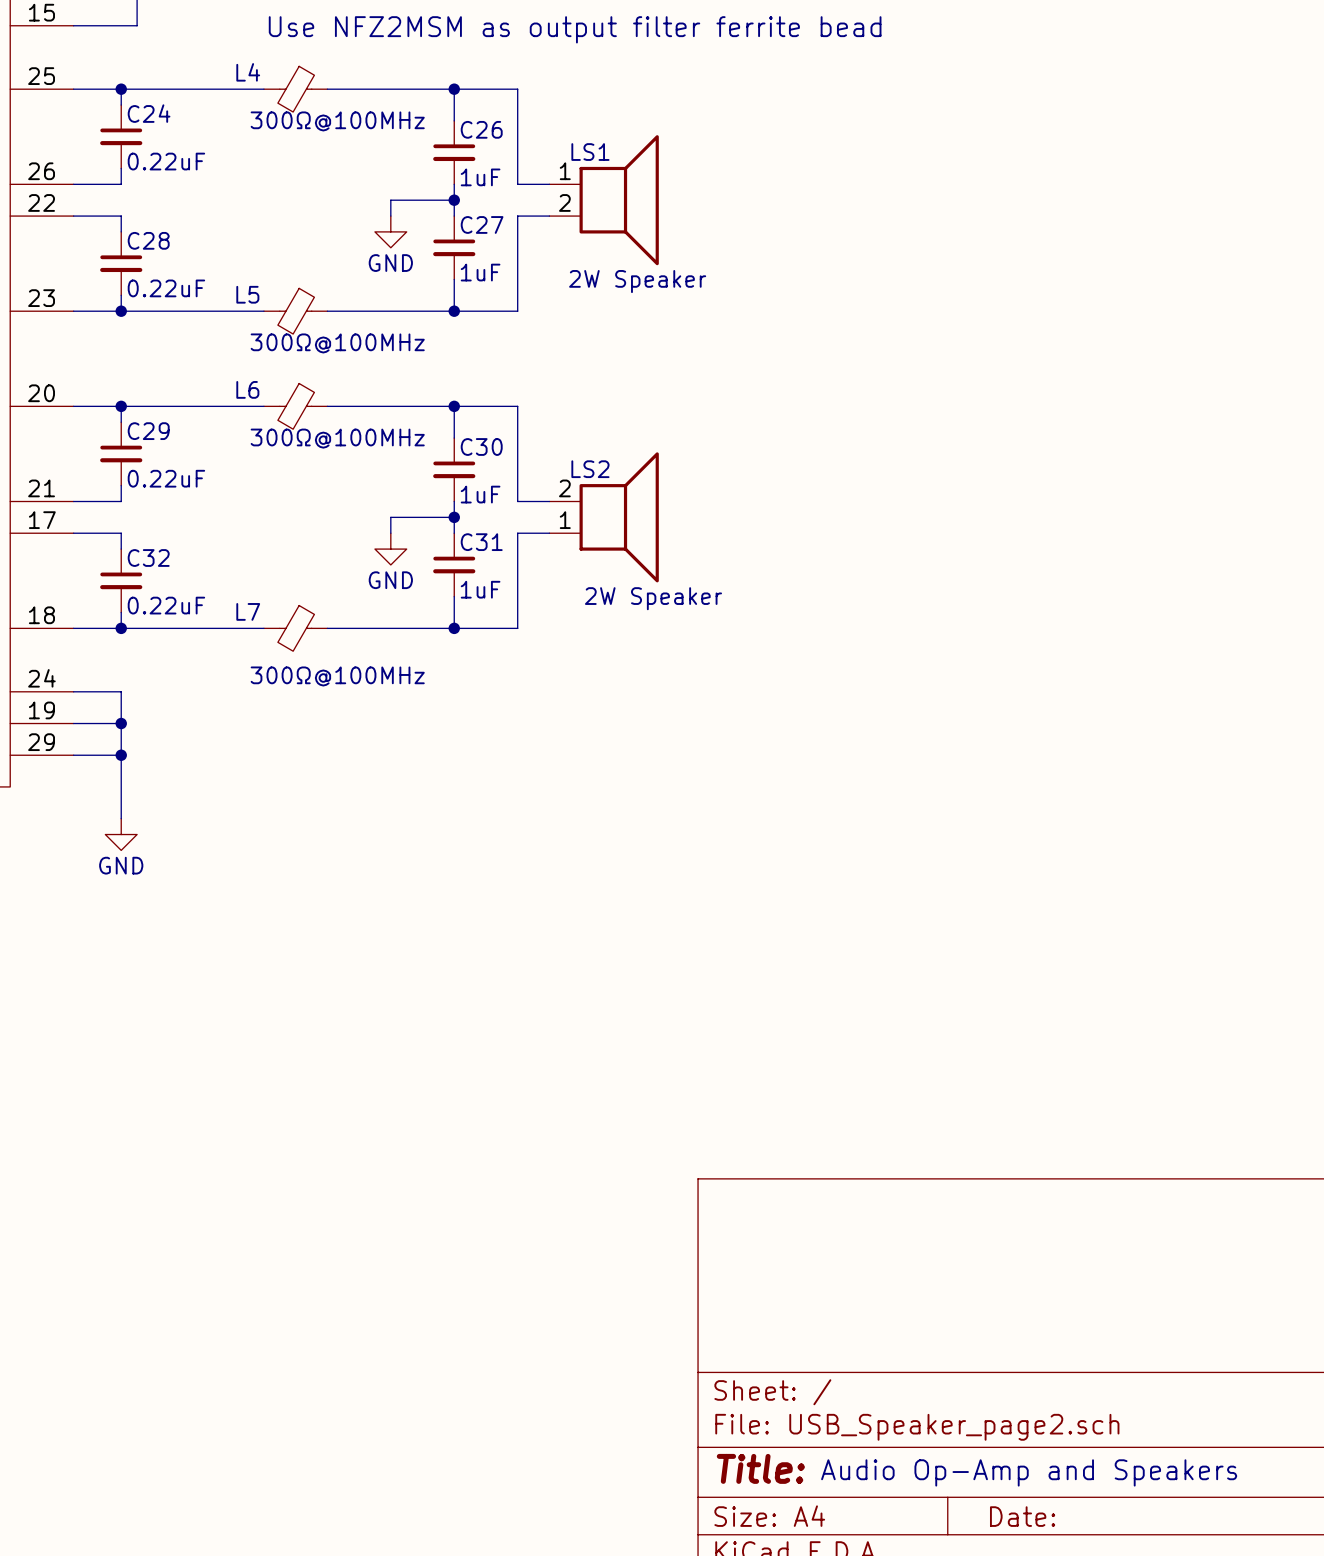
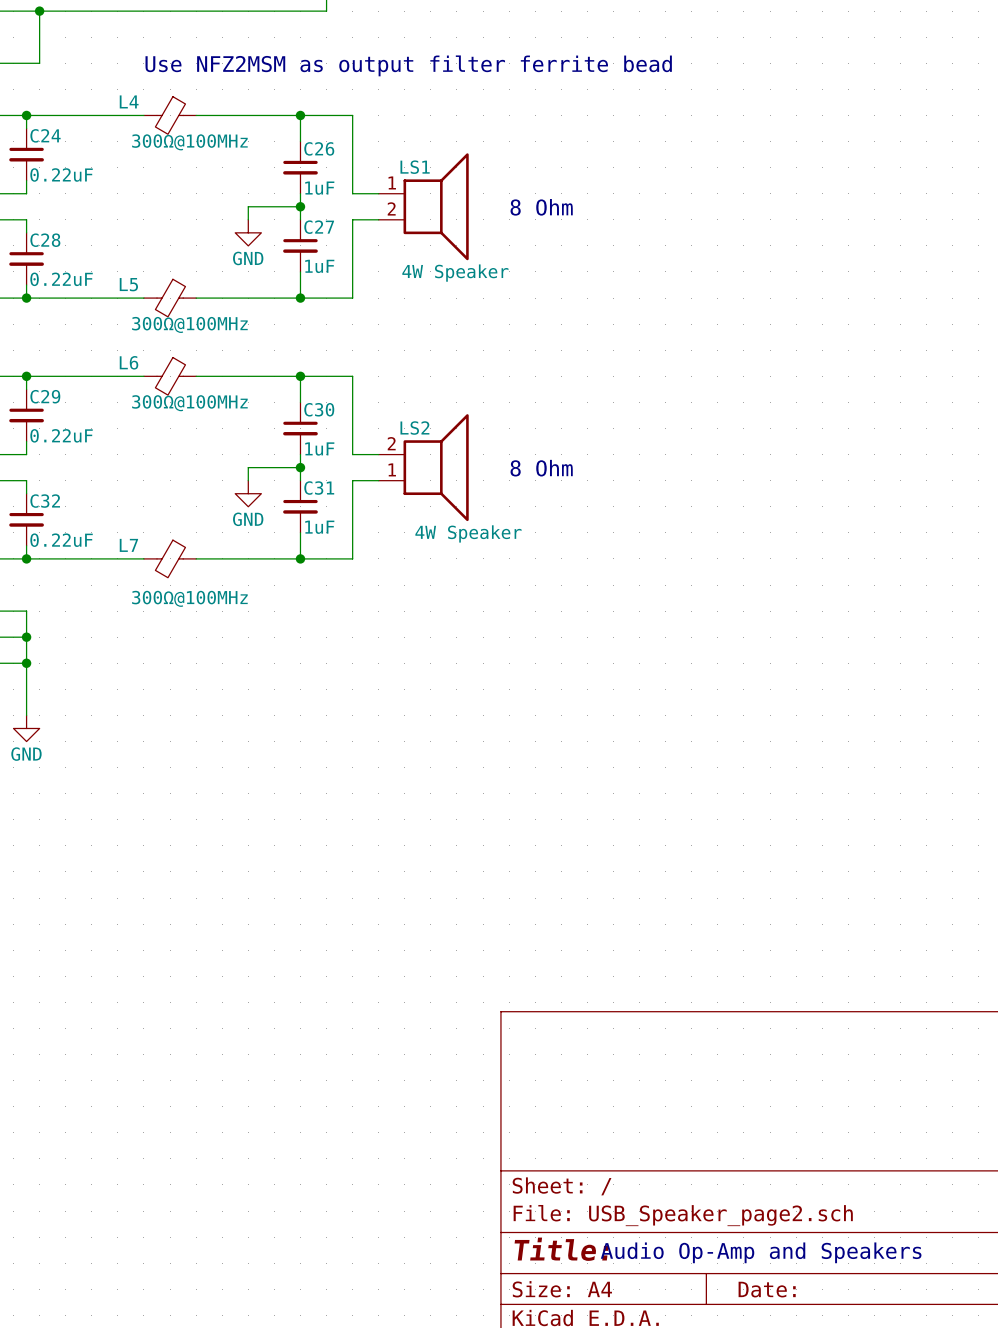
text: none -> 8 Ohm (541, 207)
LS1 value: 2W Speaker (637, 281) -> 4W Speaker (455, 273)
text: none -> 8 Ohm (541, 468)
LS2 value: 2W Speaker (653, 598) -> 4W Speaker (468, 533)

